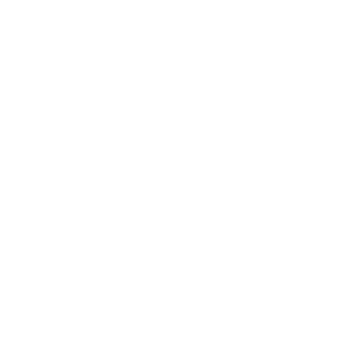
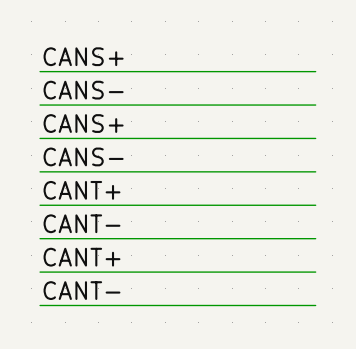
label: none -> CANS+ (83, 56)
wire: none -> (40, 71) (315, 71)
label: none -> CANS- (83, 90)
wire: none -> (40, 105) (315, 105)
label: none -> CANS+ (83, 123)
wire: none -> (40, 138) (315, 138)
label: none -> CANS- (83, 156)
wire: none -> (40, 171) (315, 171)
label: none -> CANT+ (81, 190)
wire: none -> (40, 205) (315, 205)
label: none -> CANT- (81, 223)
wire: none -> (40, 238) (315, 238)
label: none -> CANT+ (81, 257)
wire: none -> (40, 272) (315, 272)
label: none -> CANT- (81, 290)
wire: none -> (40, 305) (315, 305)

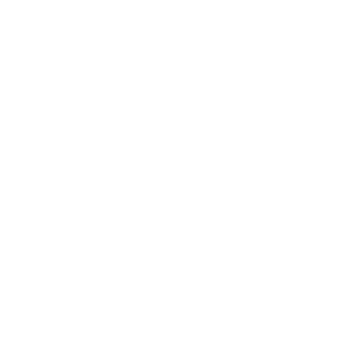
label: CANS+ (83, 56) -> none
wire: (40, 71) (315, 71) -> none
label: CANS- (83, 90) -> none
wire: (40, 105) (315, 105) -> none
label: CANS+ (83, 123) -> none
wire: (40, 138) (315, 138) -> none
label: CANS- (83, 156) -> none
wire: (40, 171) (315, 171) -> none
label: CANT+ (81, 190) -> none
wire: (40, 205) (315, 205) -> none
label: CANT- (81, 223) -> none
wire: (40, 238) (315, 238) -> none
label: CANT+ (81, 257) -> none
wire: (40, 272) (315, 272) -> none
label: CANT- (81, 290) -> none
wire: (40, 305) (315, 305) -> none

